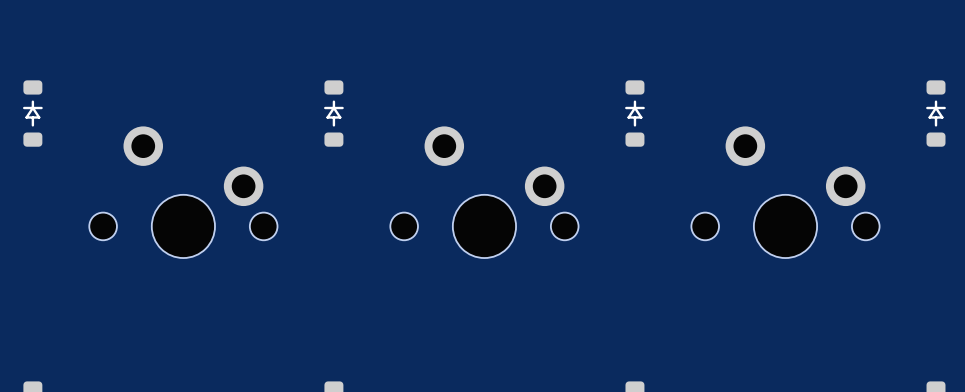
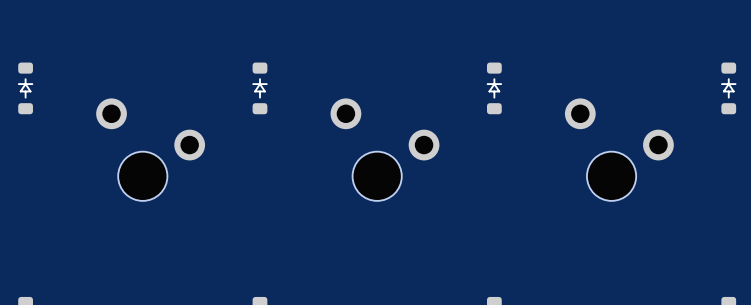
part footprint: [89, 126, 278, 259] -> [96, 98, 206, 201]
part footprint: [390, 126, 579, 259] -> [330, 98, 440, 201]
part footprint: [691, 126, 880, 259] -> [564, 98, 674, 201]

